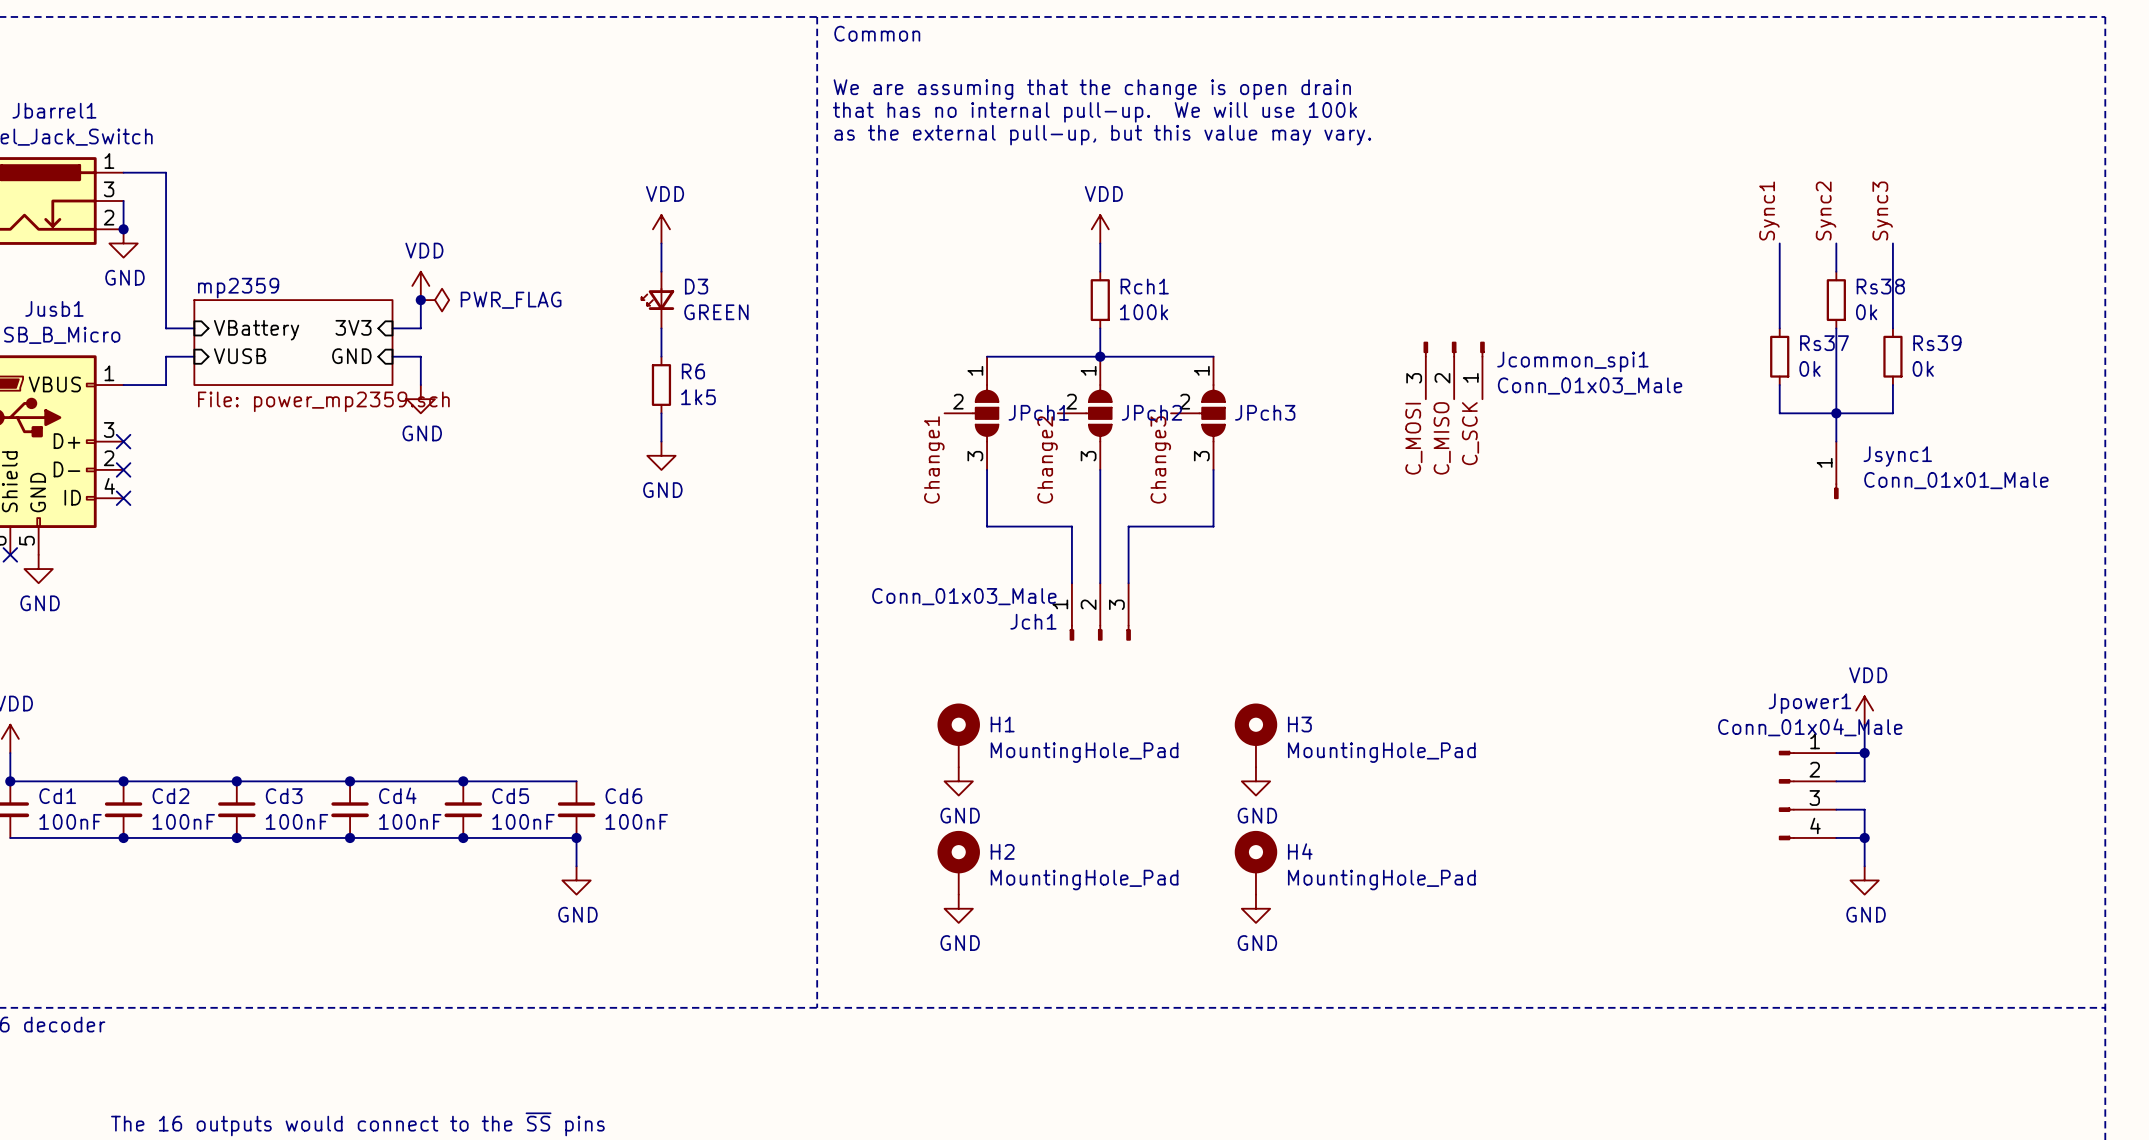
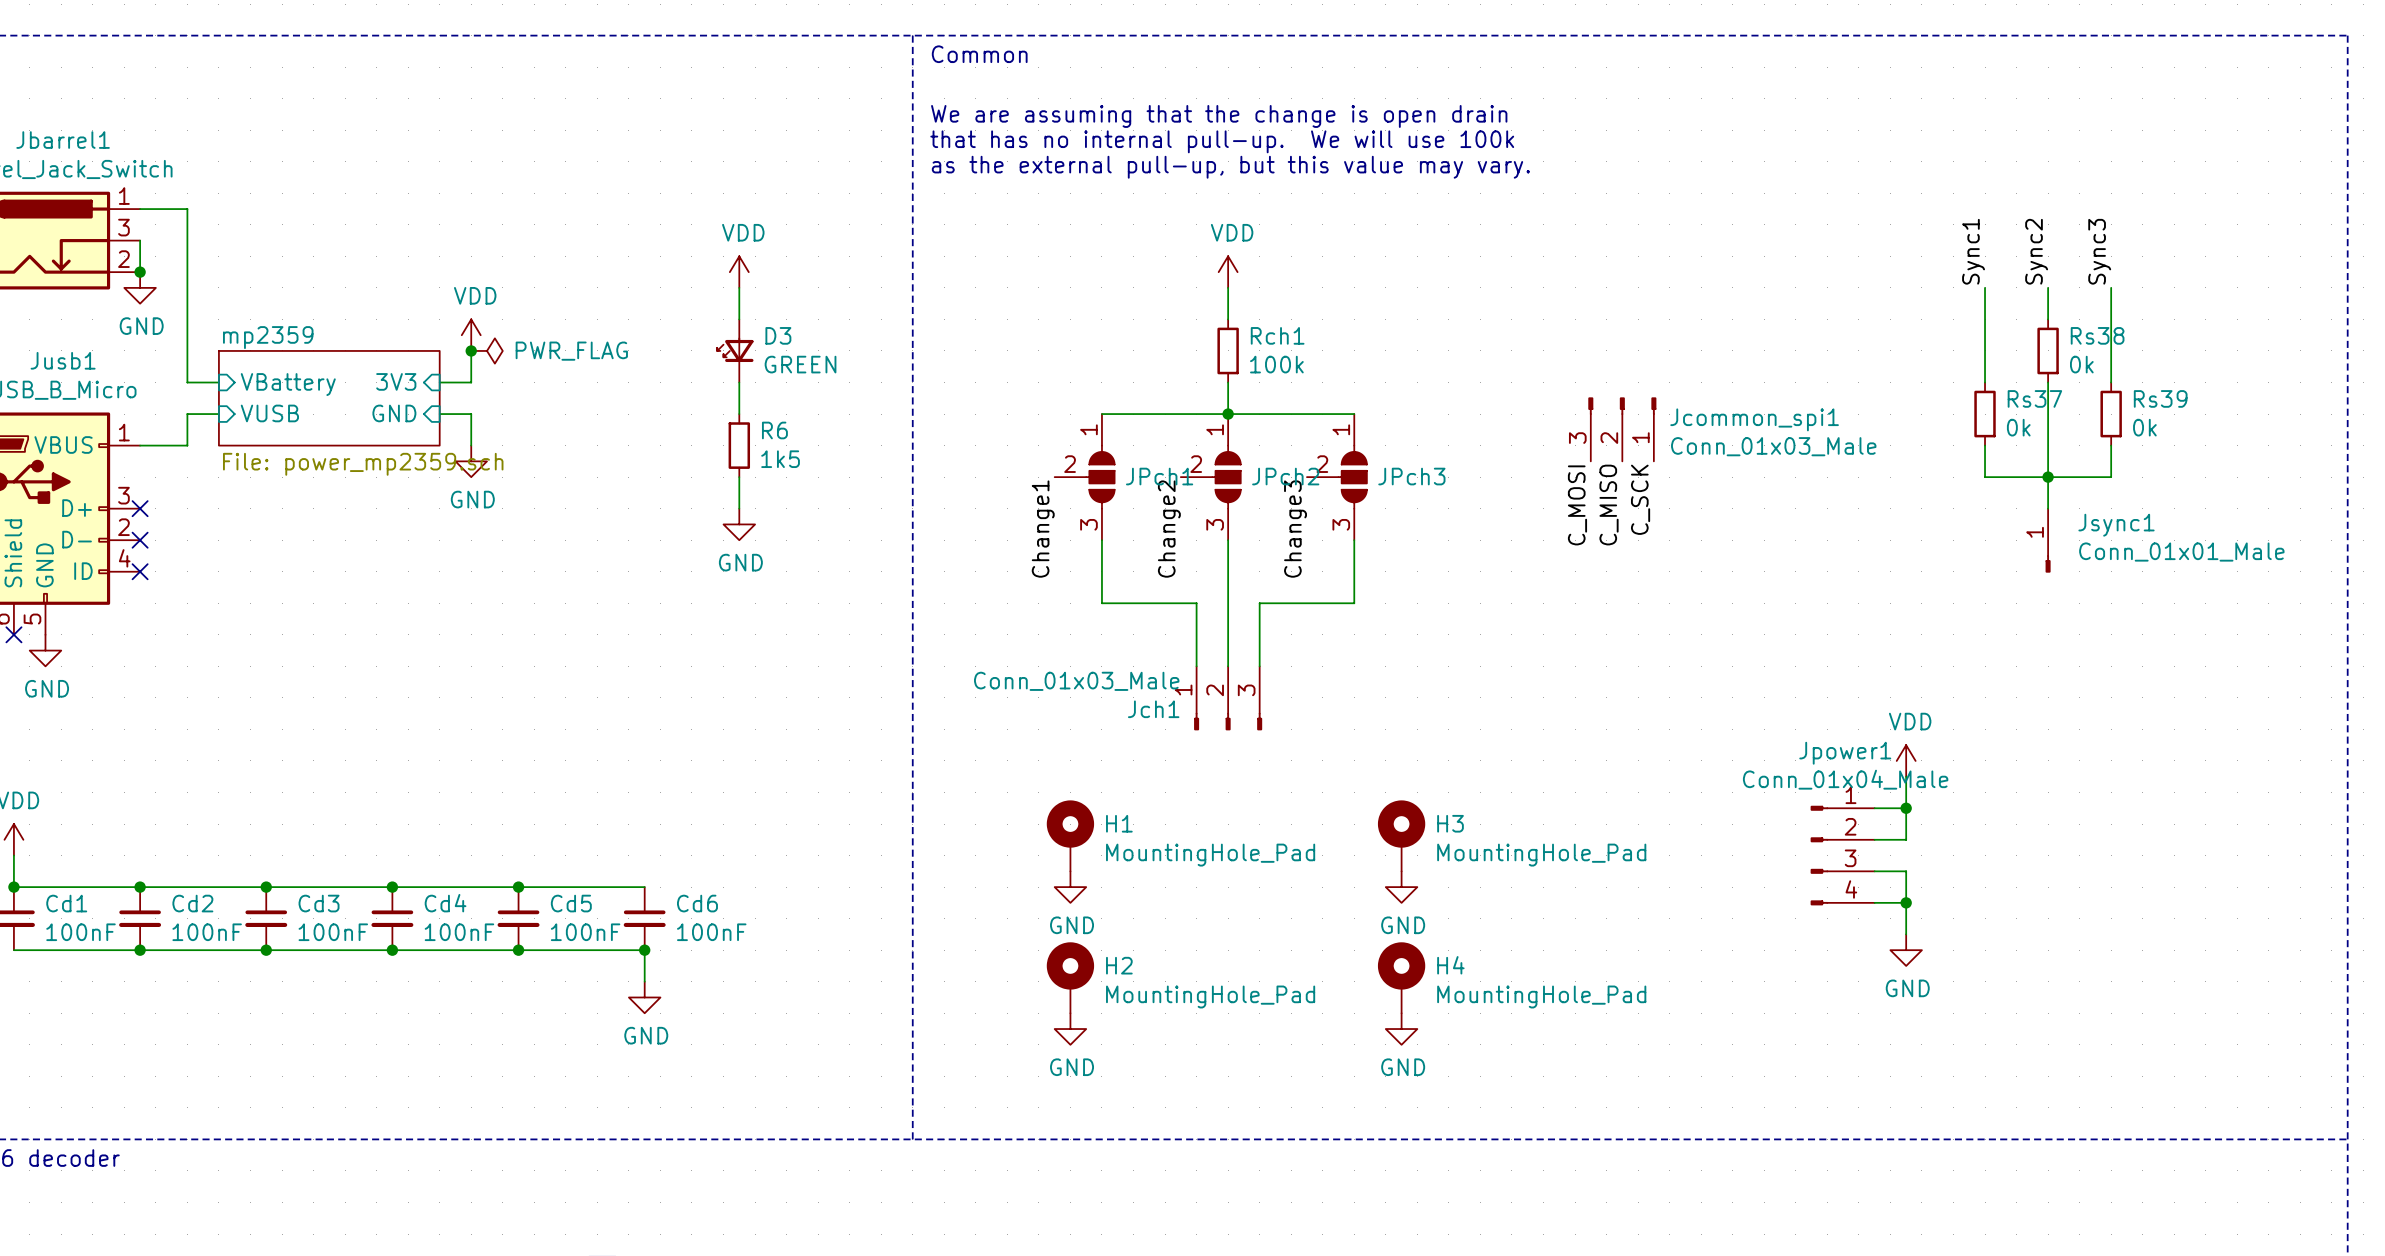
junction: none -> (1906, 808)
power symbol position: VDD (1864, 710) -> VDD (1906, 760)
wire: (1864, 724) (1864, 781) (1836, 781) -> (1906, 776) (1906, 839) (1874, 839)
wire: (1836, 753) (1864, 753) -> (1874, 808) (1906, 808)
junction: (1864, 753) -> none
junction: none -> (1906, 902)
Jpower1 position: (1807, 795) -> (1842, 855)
wire: (1836, 809) (1864, 809) (1864, 866) -> (1874, 871) (1906, 871) (1906, 934)
wire: (1836, 837) (1864, 837) -> (1874, 902) (1906, 902)
junction: (1864, 837) -> none
power symbol position: GND (1864, 880) -> GND (1906, 950)

